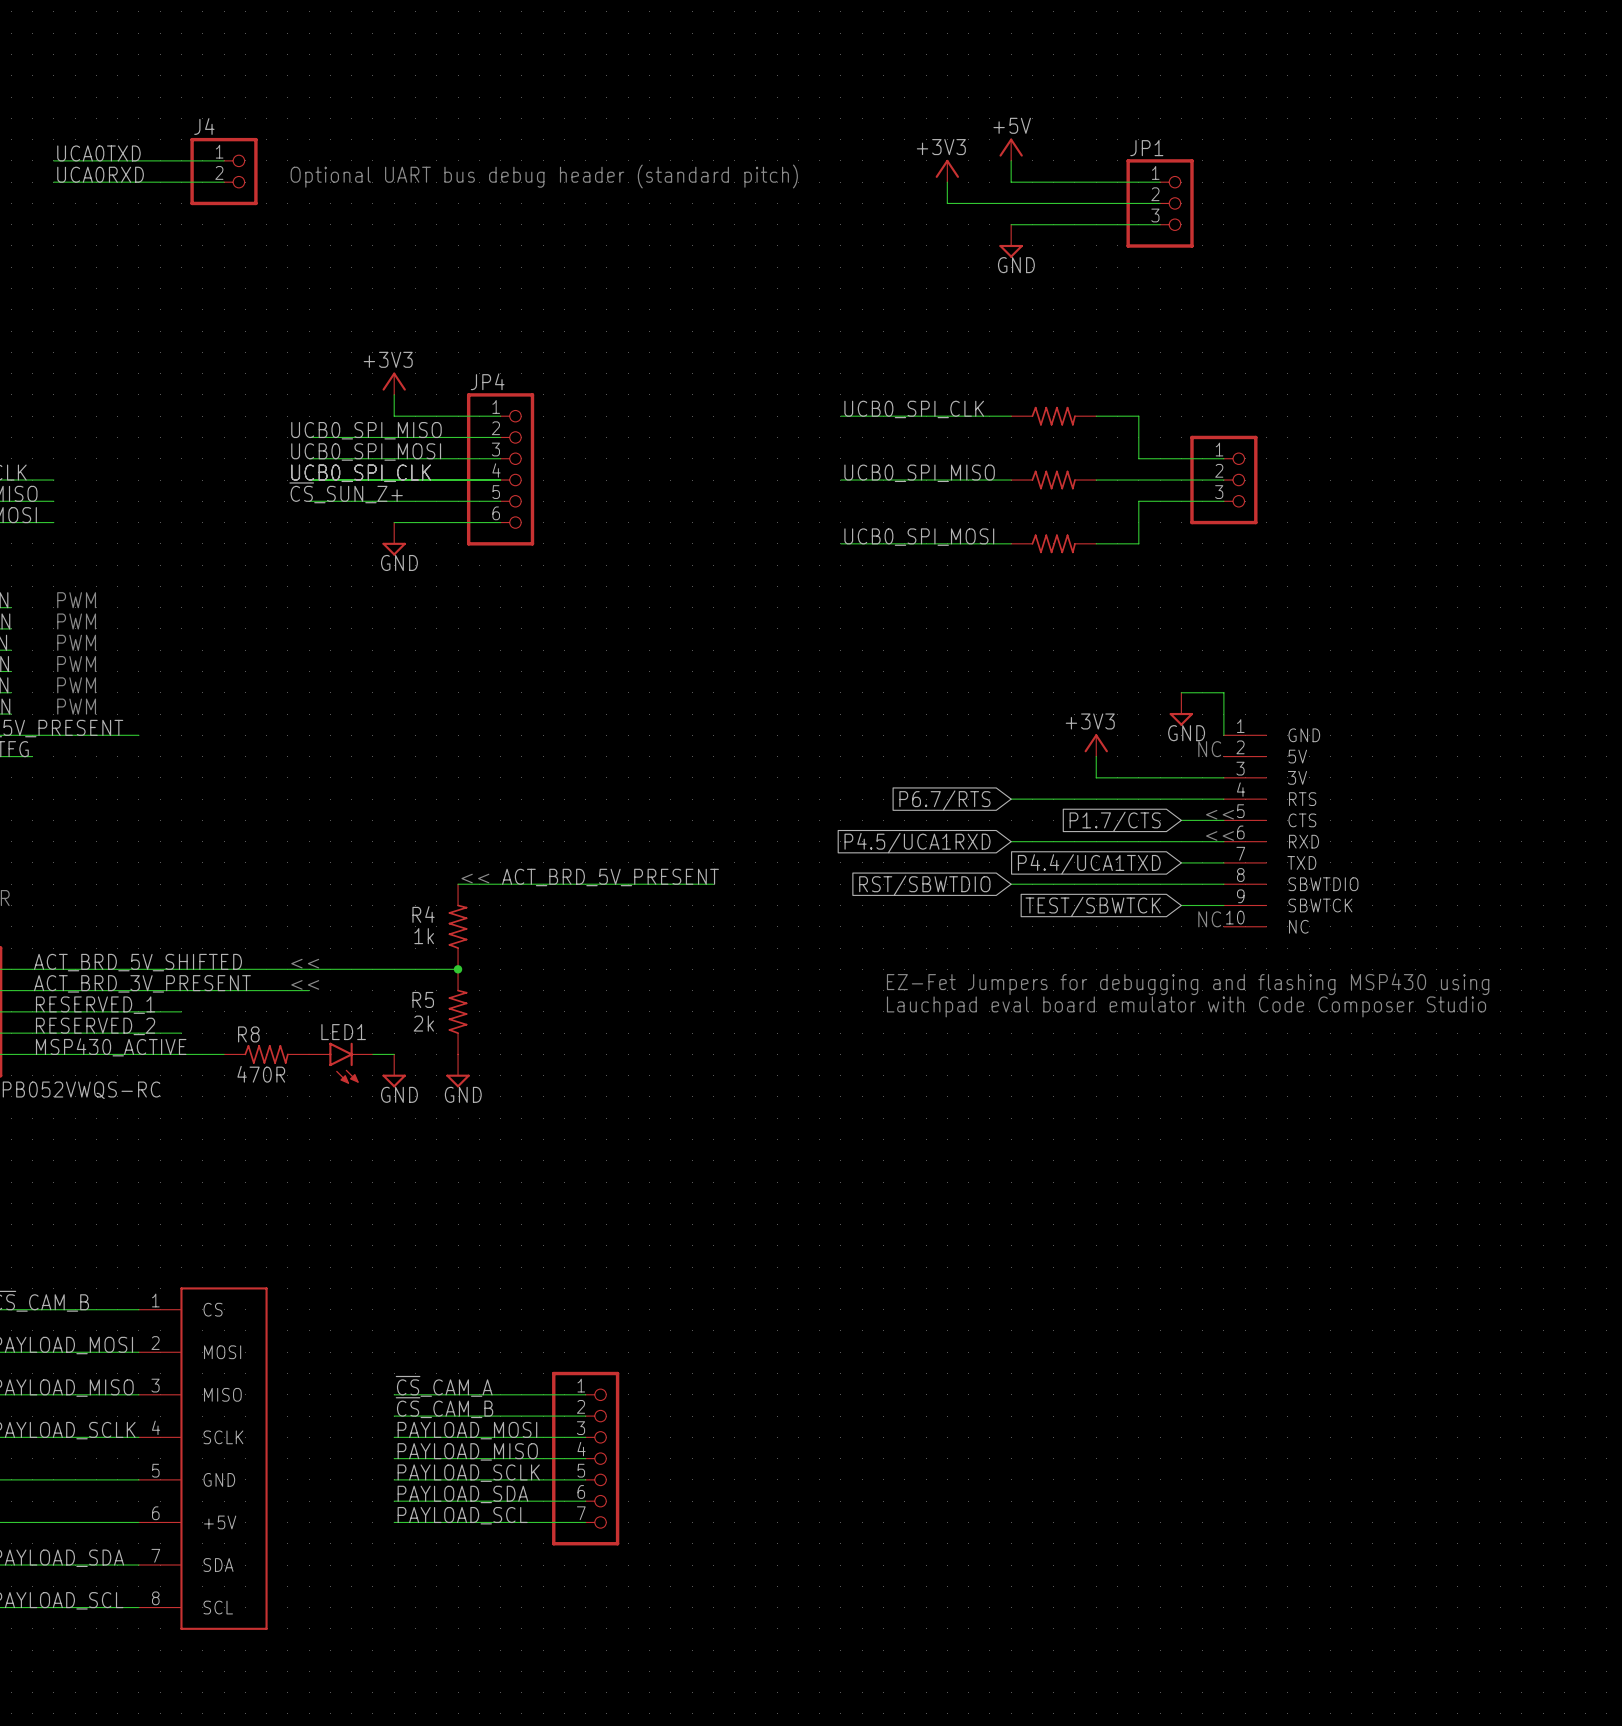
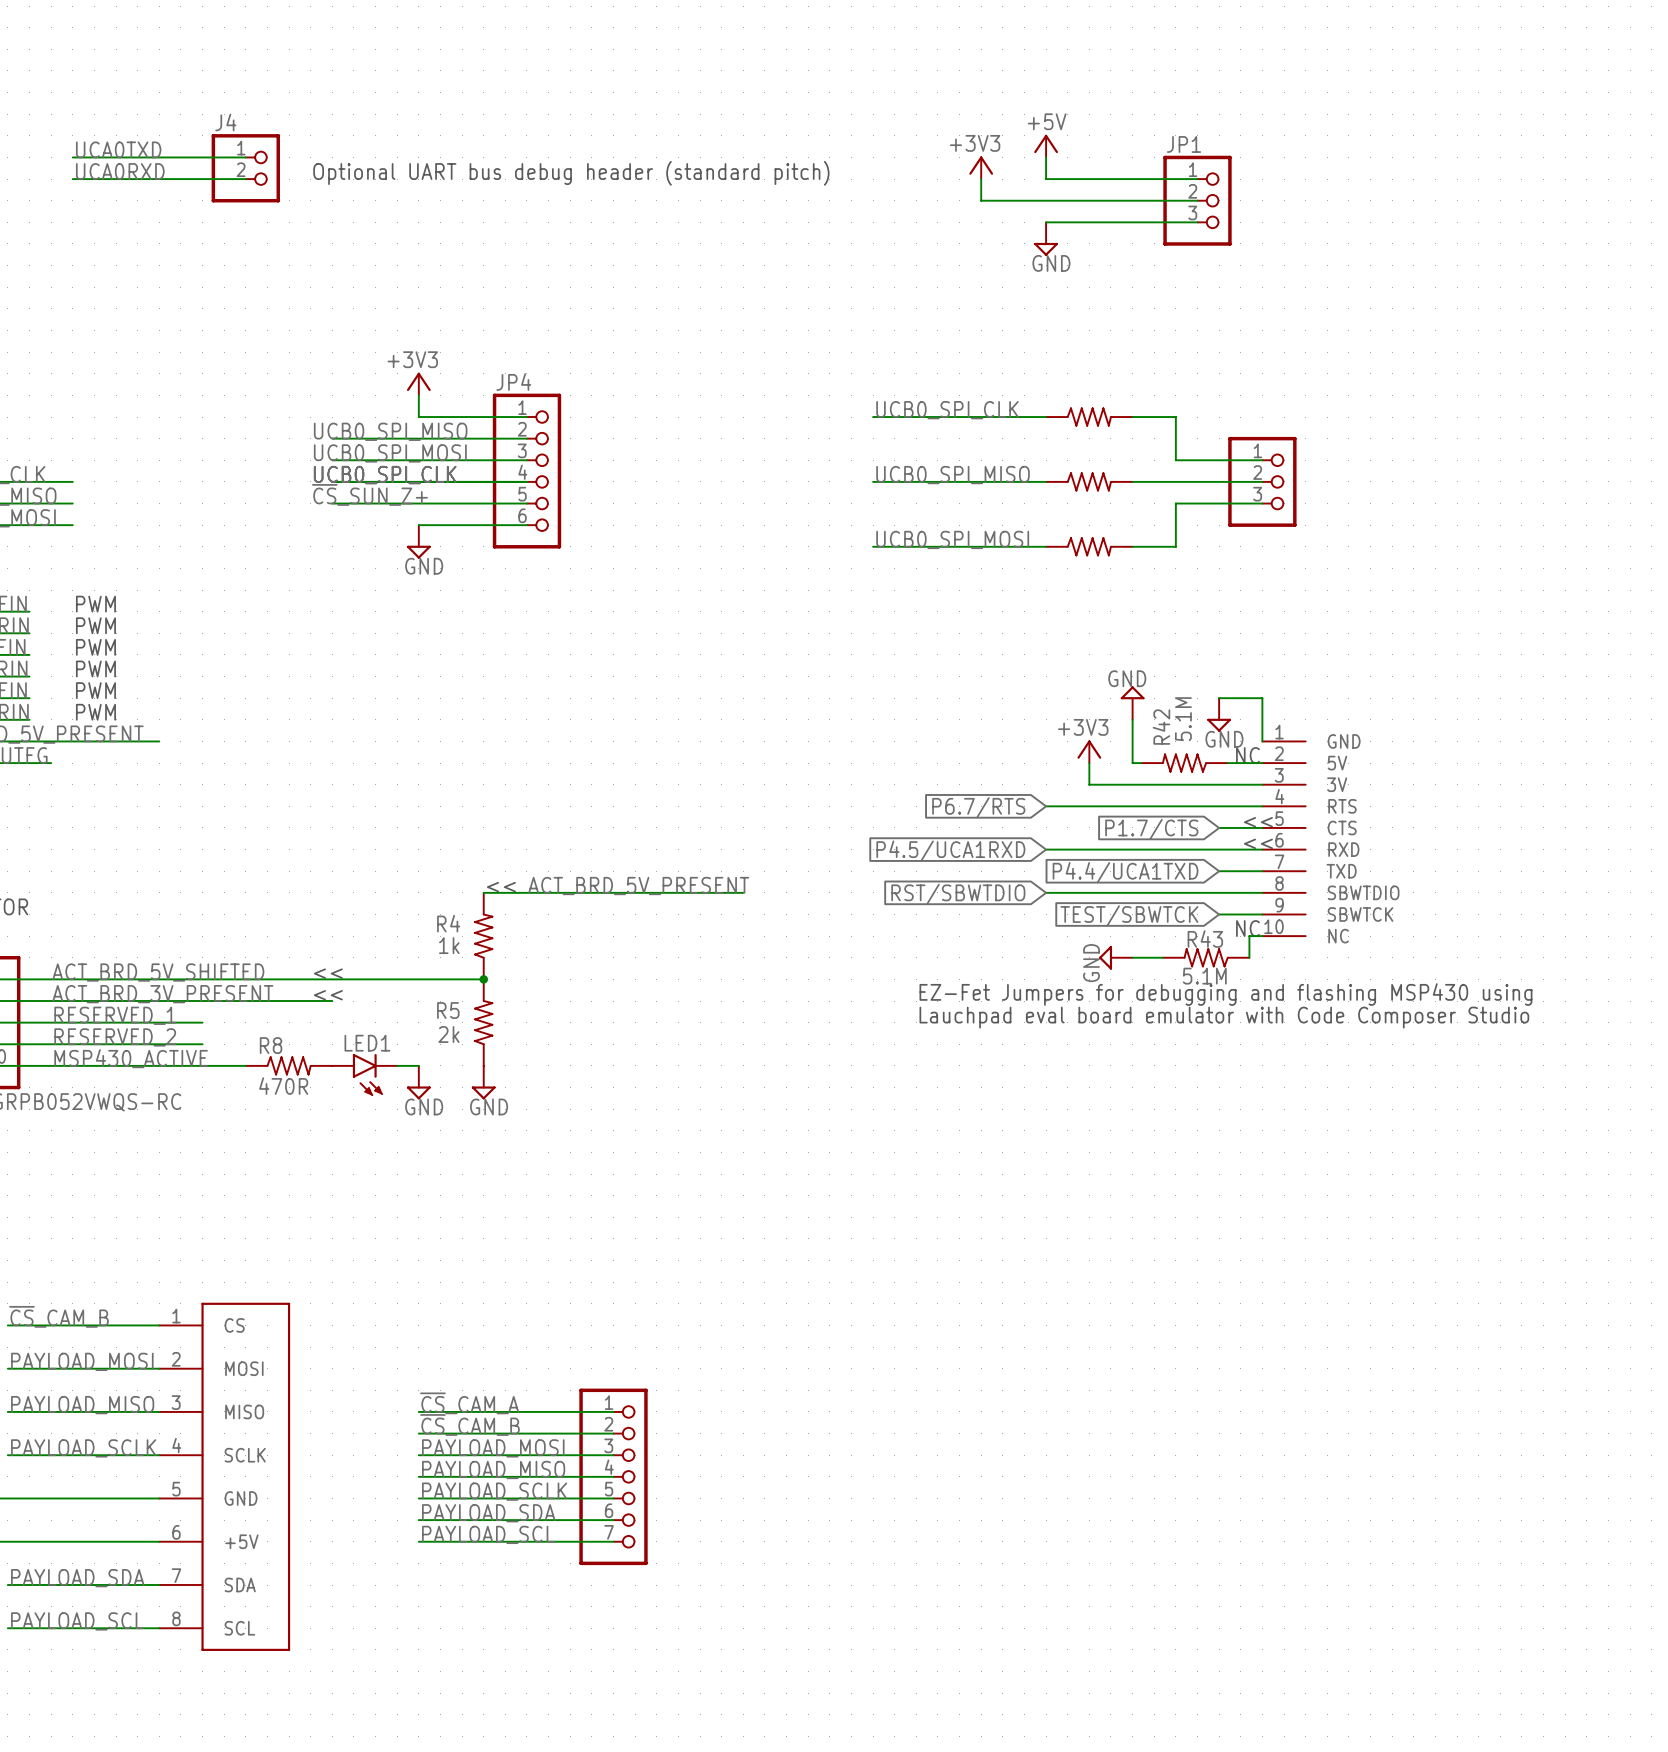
power symbol: none -> GND (1132, 703)
power symbol position: +3V3 (1096, 745) -> +3V3 (1089, 751)
wire: (1096, 756) (1096, 777) -> (1089, 763) (1089, 784) (1132, 784)
R42: none -> 5.1M (1184, 763)
wire: none -> (1227, 763) (1262, 763)
wire: none -> (1262, 936) (1249, 936) (1249, 957)
power symbol: none -> GND (1115, 957)
wire: none -> (1132, 957) (1162, 957)
R43: none -> 5.1M (1206, 957)

